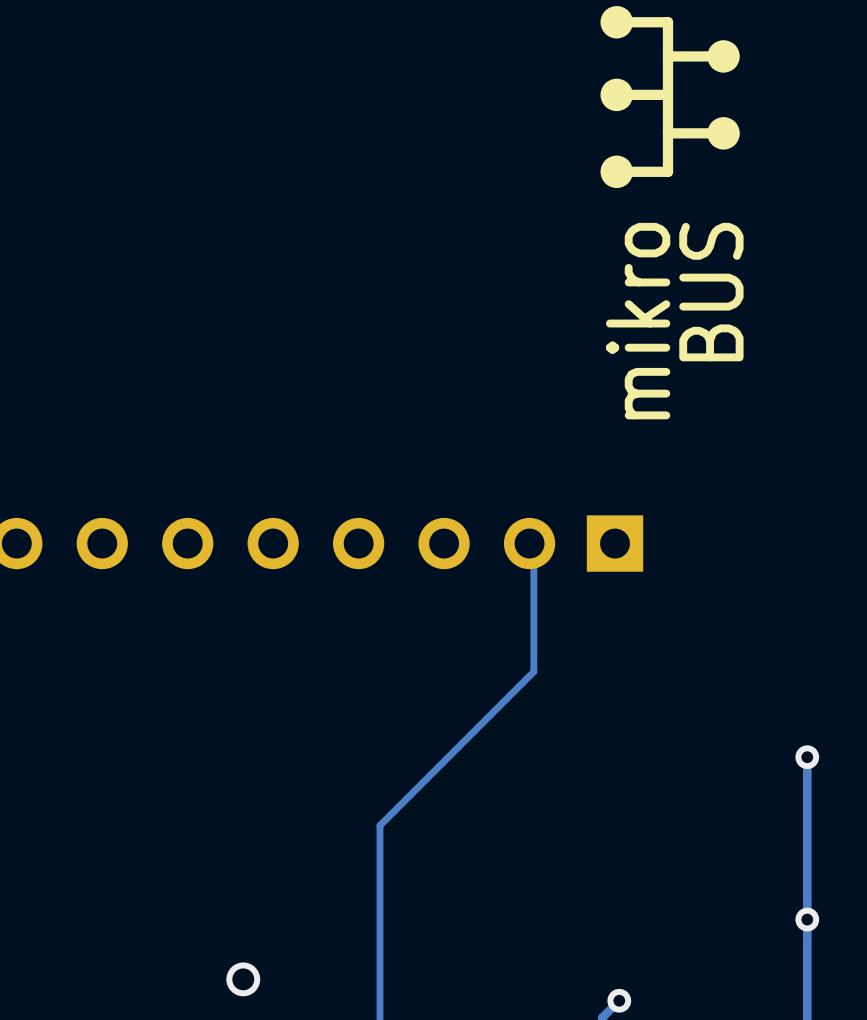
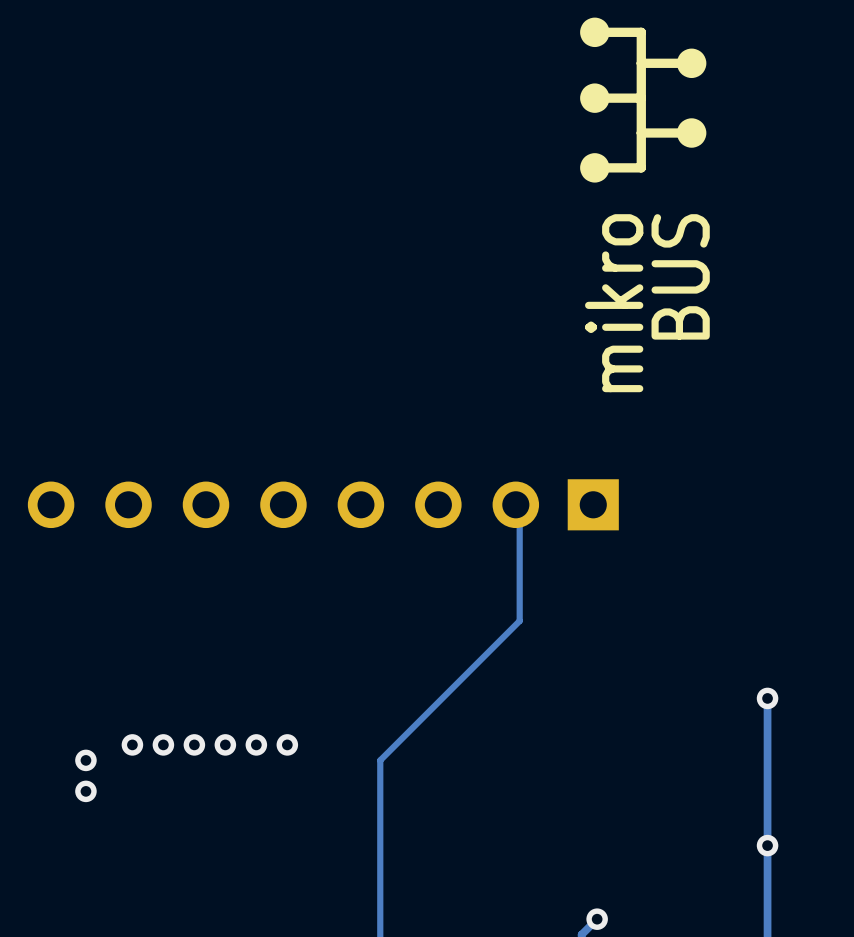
via: none -> (132, 744)
via: none -> (163, 744)
via: none -> (194, 744)
via: none -> (225, 744)
via: none -> (256, 744)
via: none -> (287, 744)
via: none -> (85, 760)
via: none -> (85, 791)
via: (243, 979) -> none

